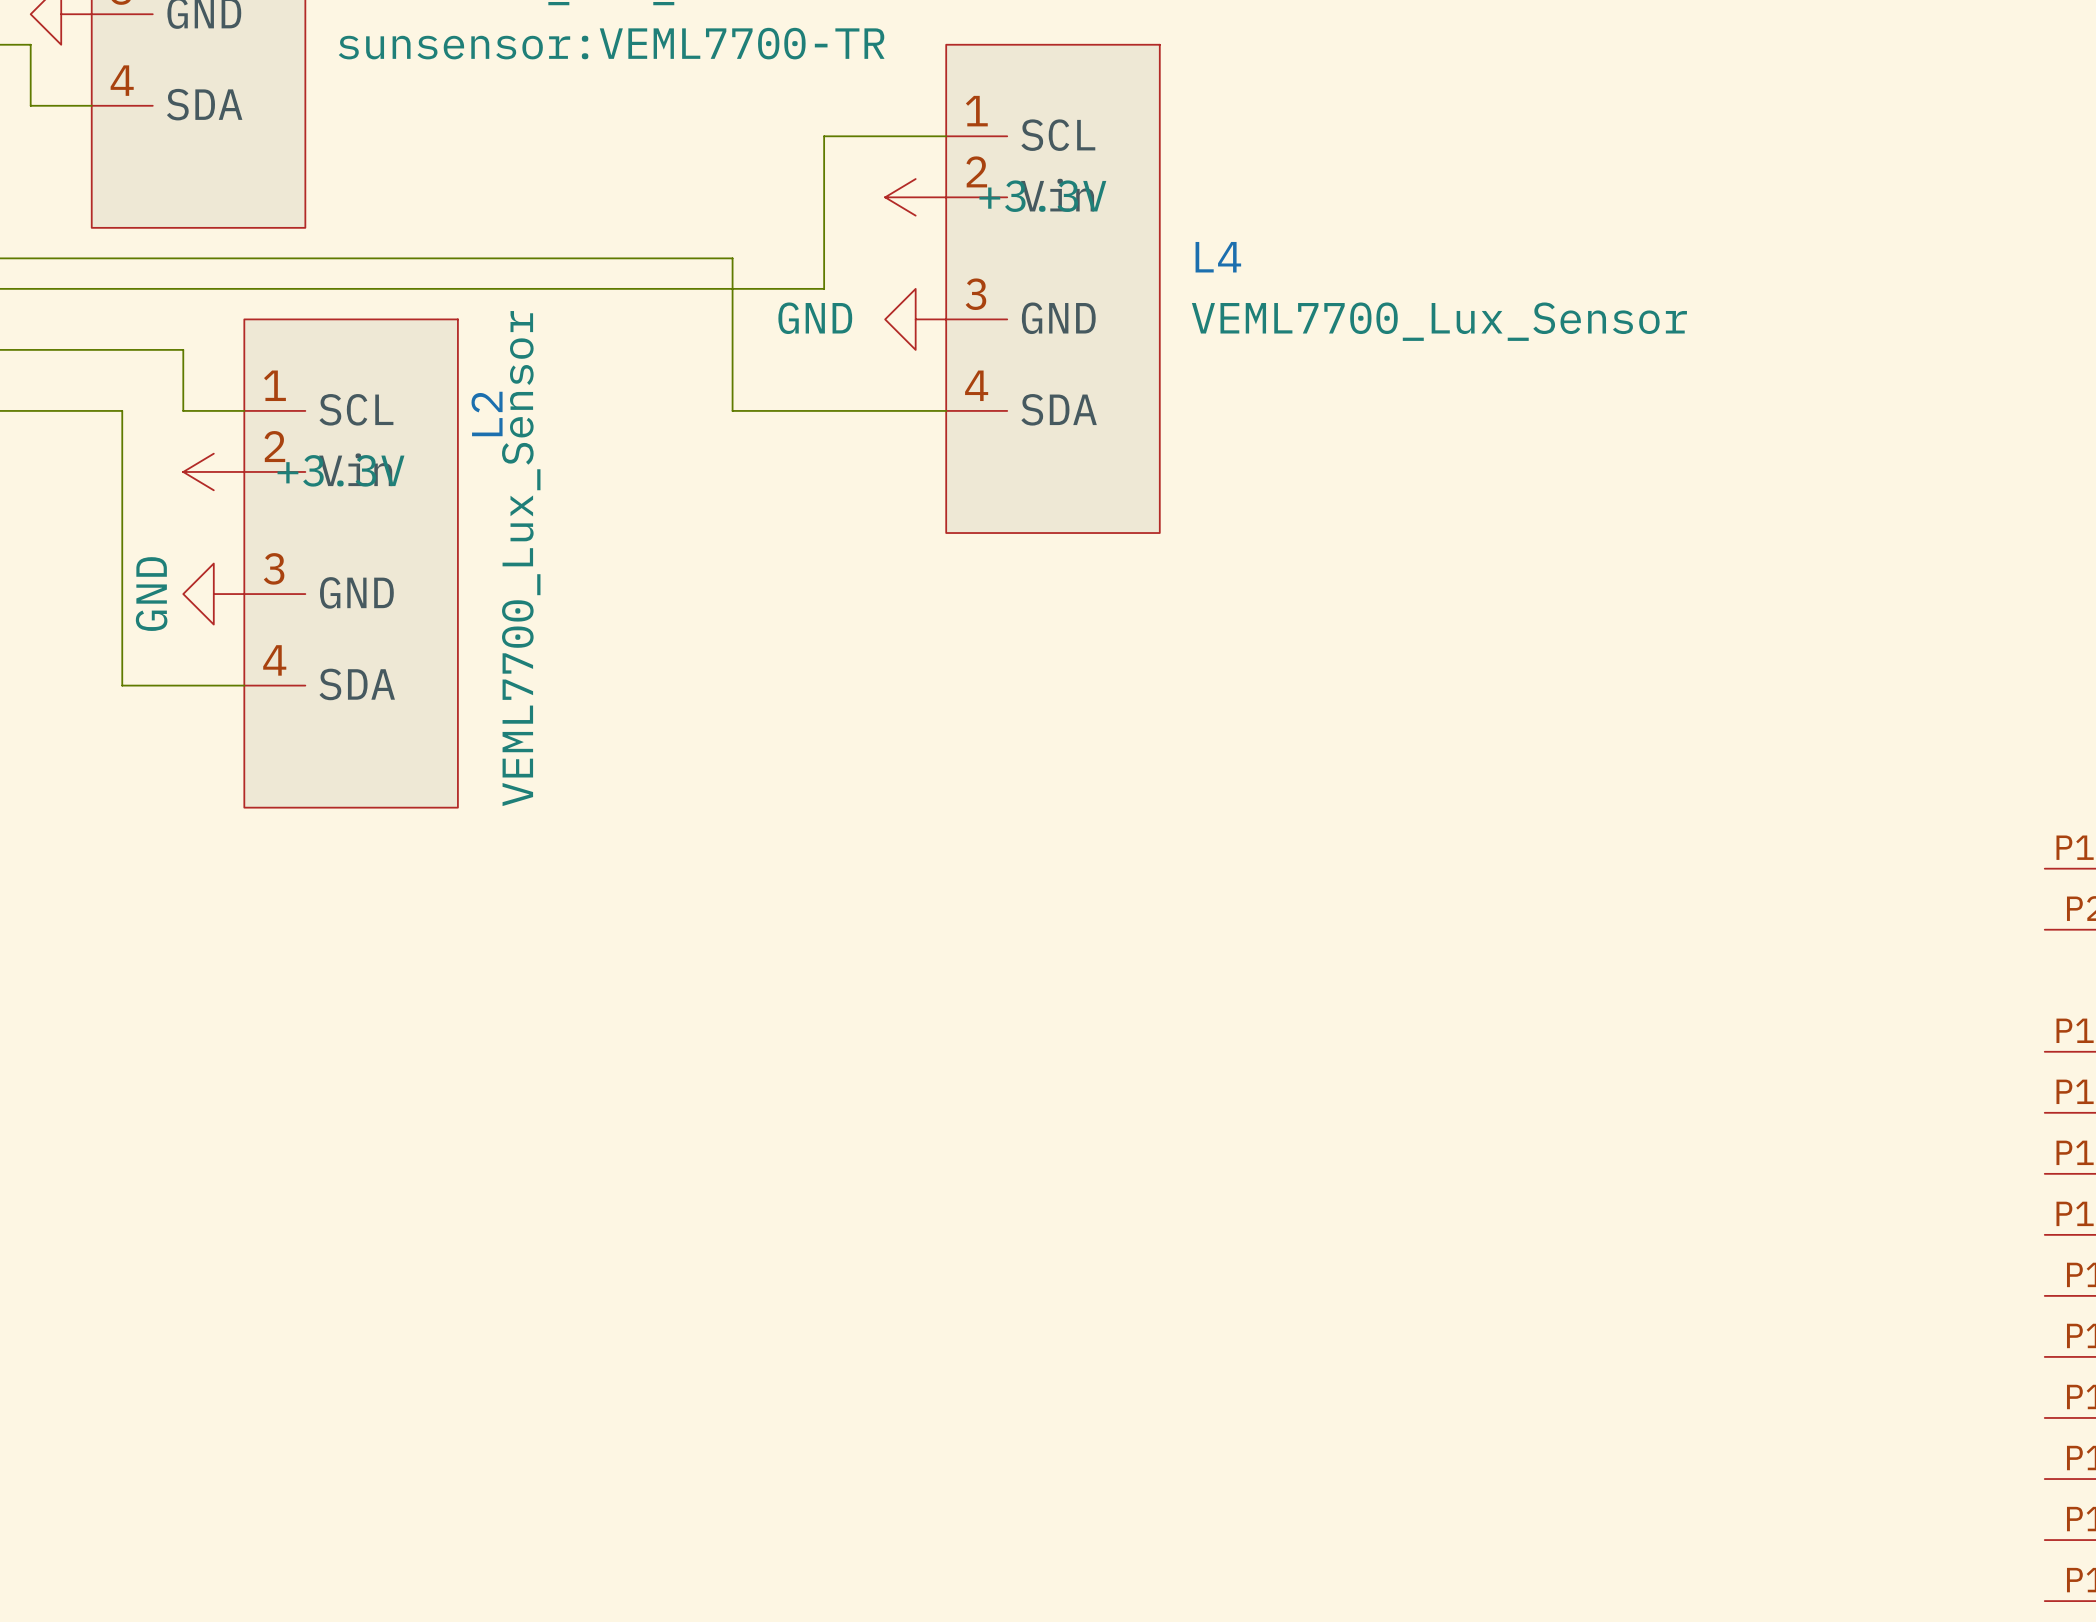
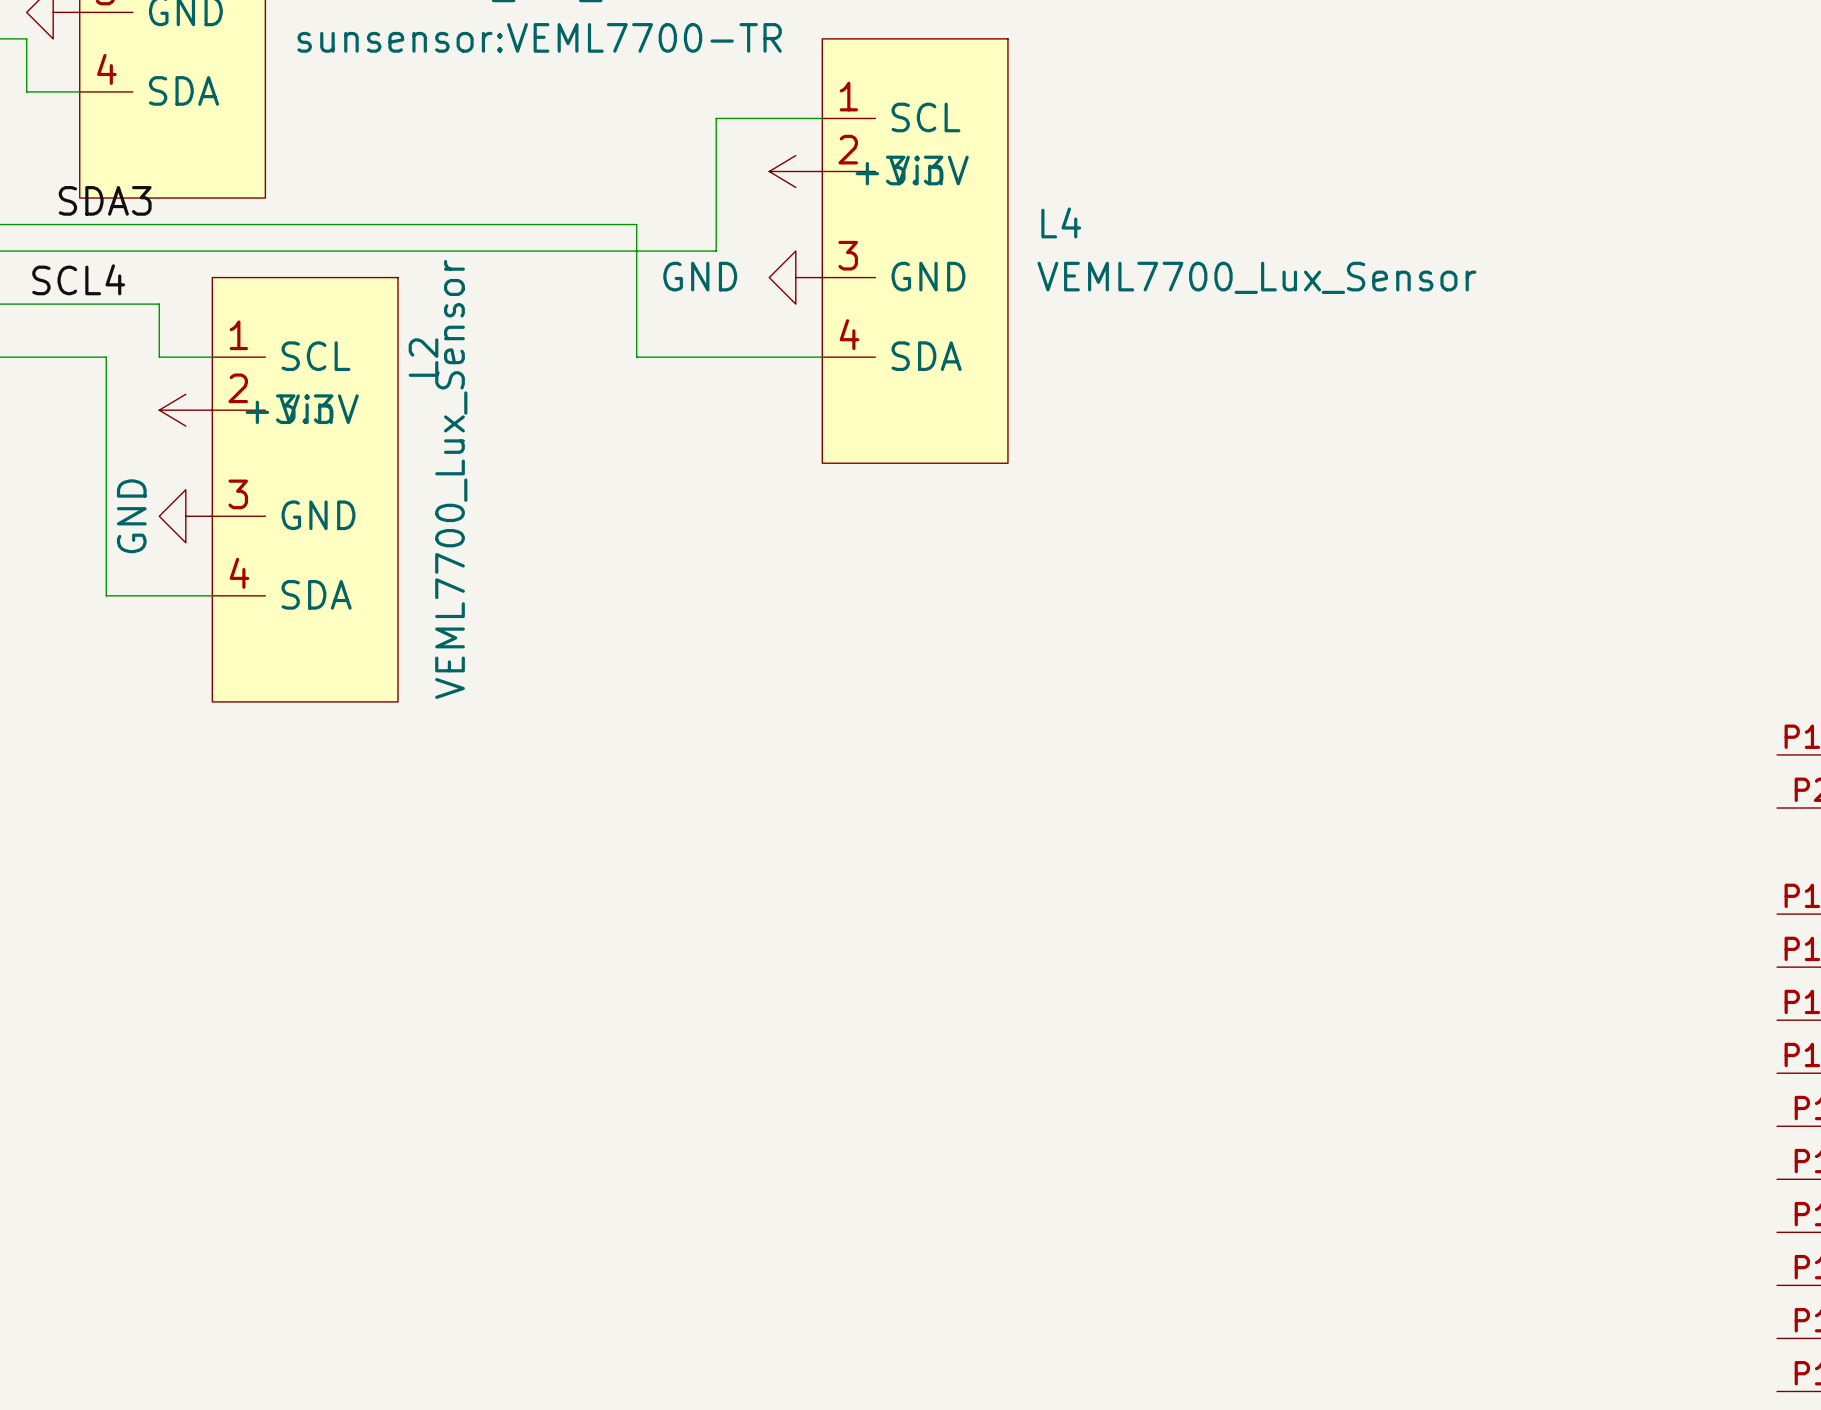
label: none -> SDA3 (105, 200)
label: none -> SCL4 (78, 279)

